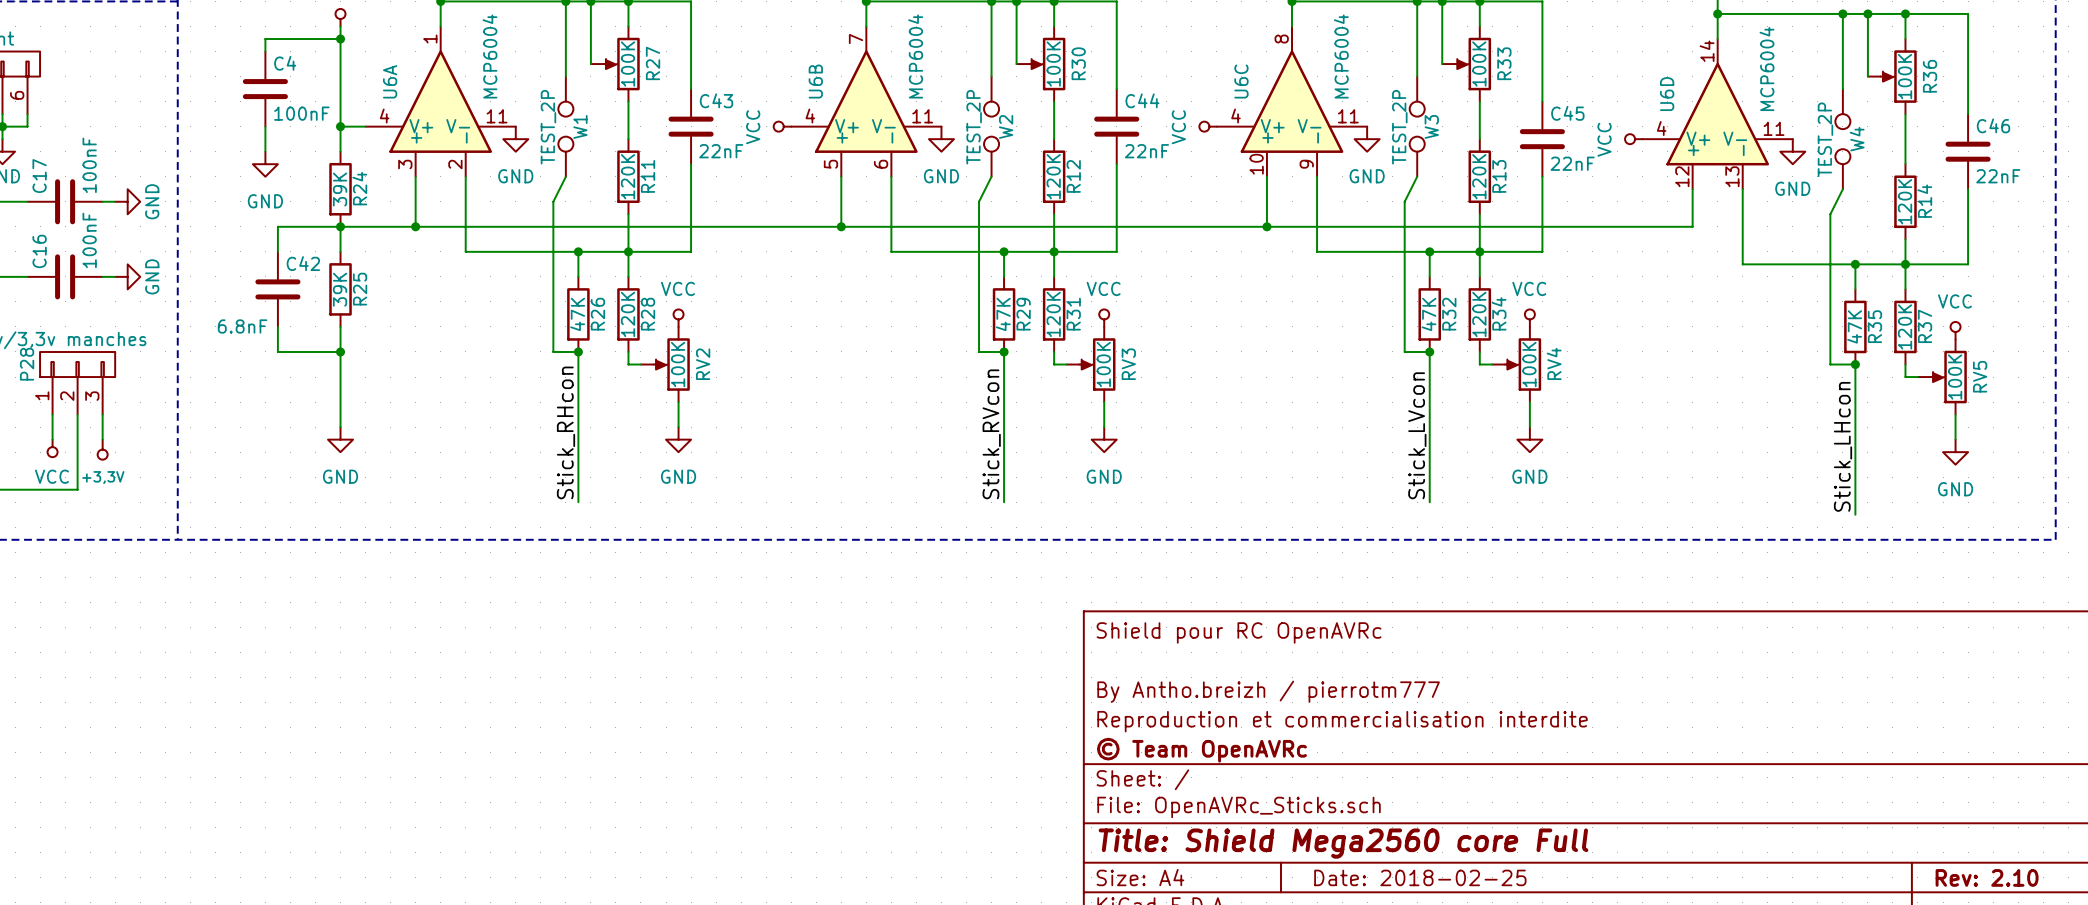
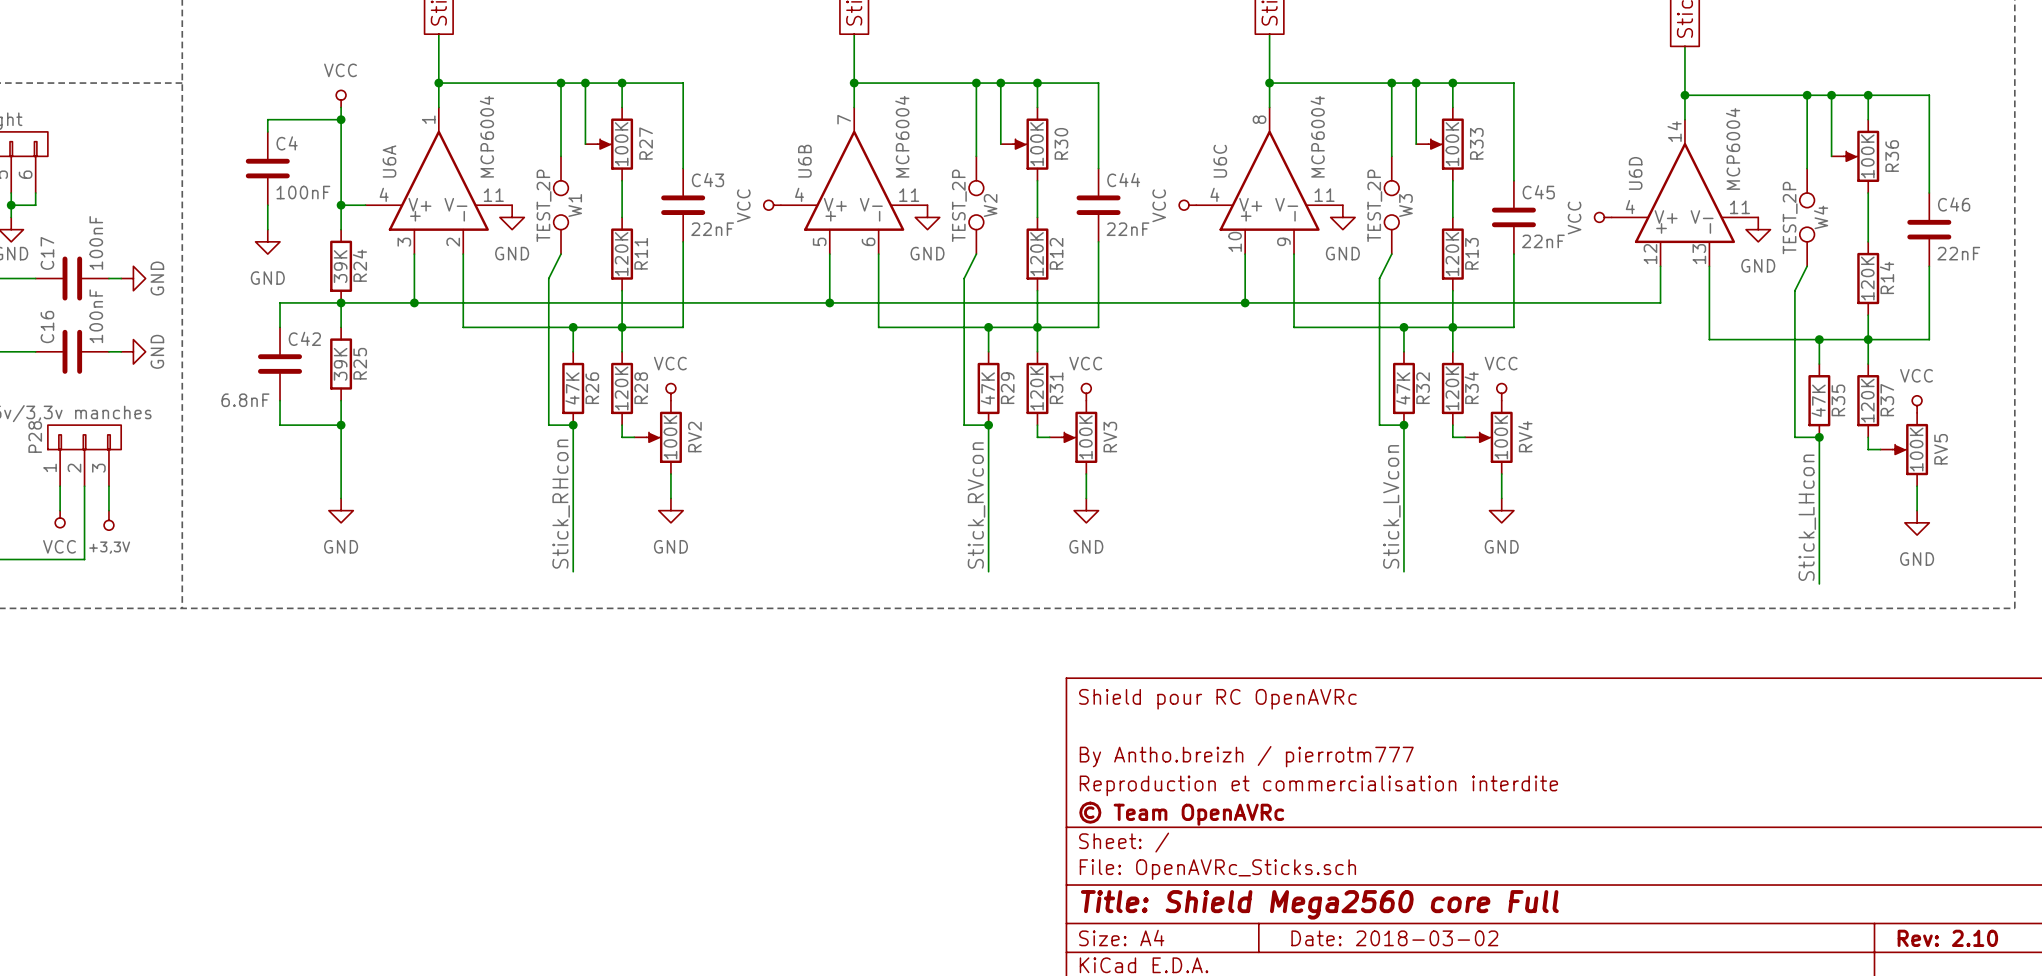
title block: Date: 2018-02-25 (1420, 877) -> Date: 2018-03-02 (1394, 938)

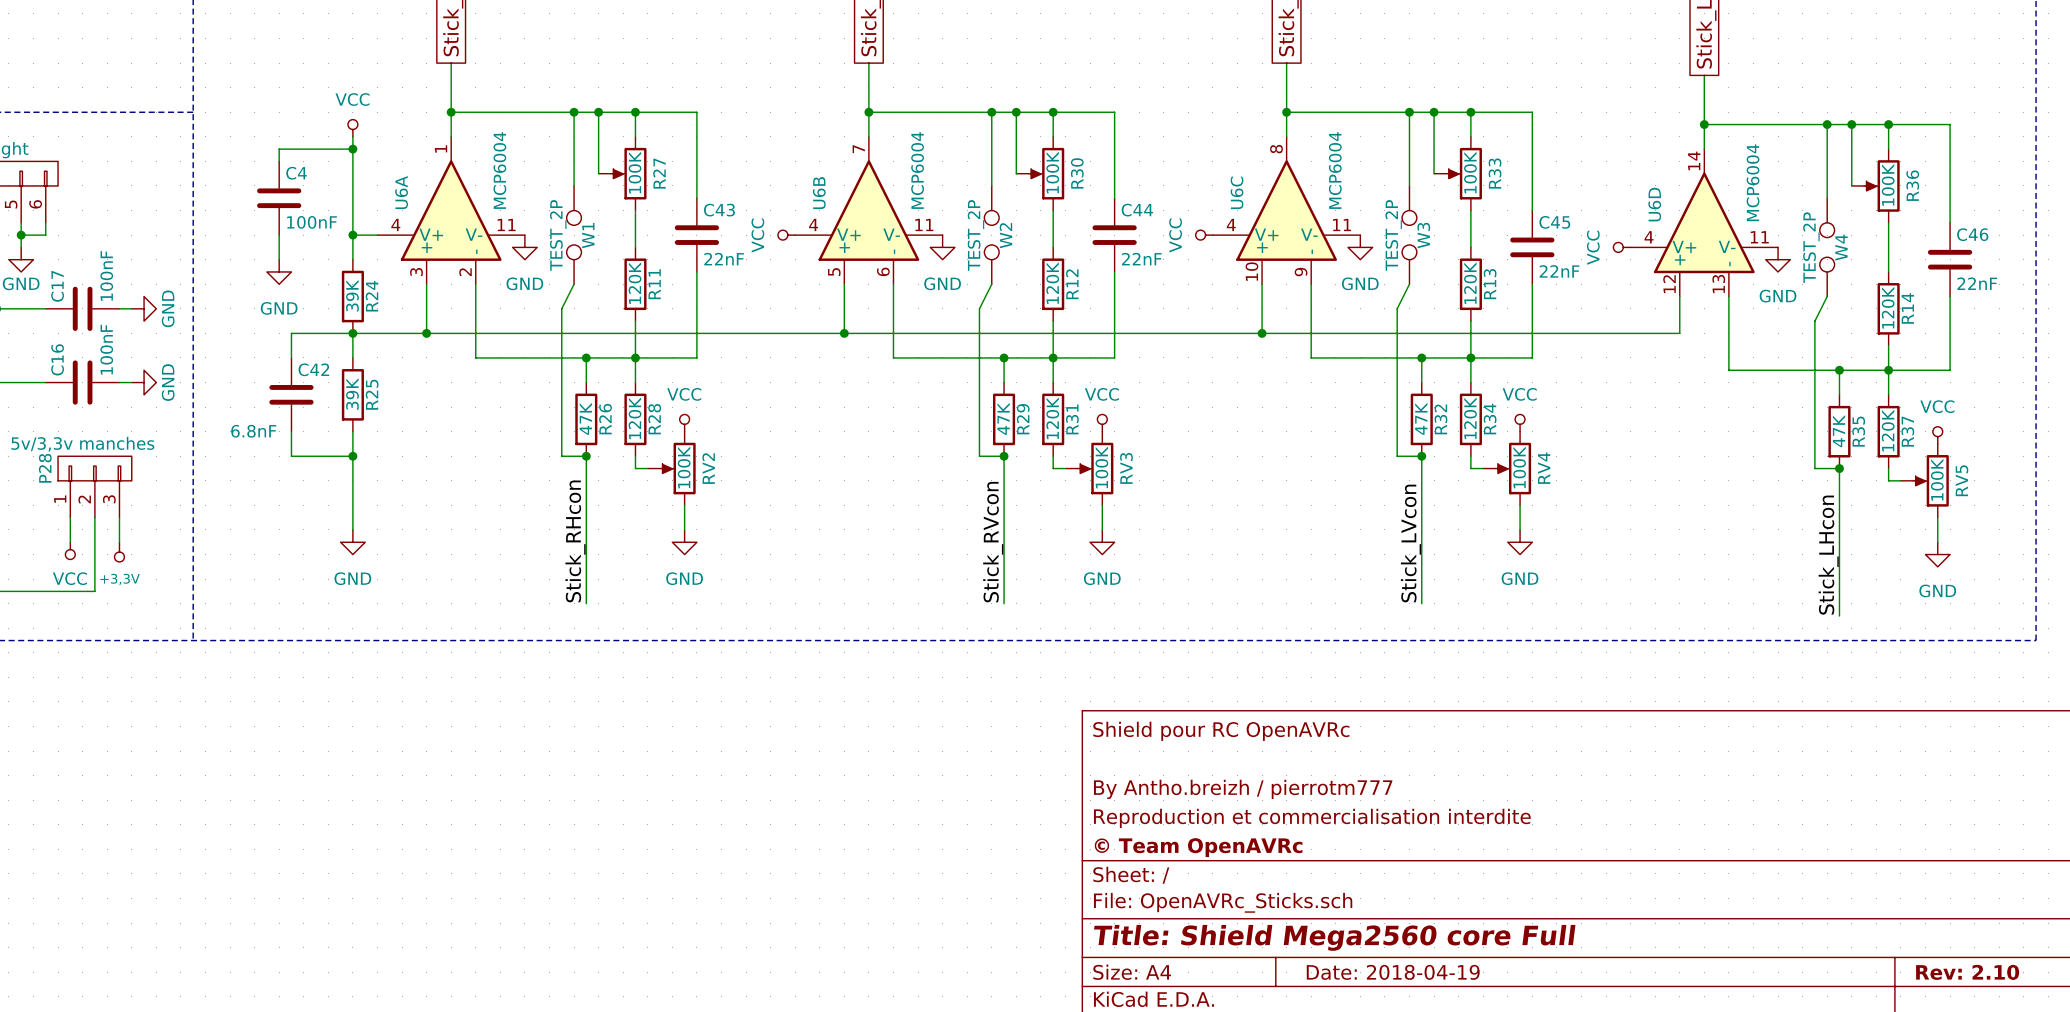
title block: Date: 2018-03-02 (1394, 938) -> Date: 2018-04-19 (1393, 972)

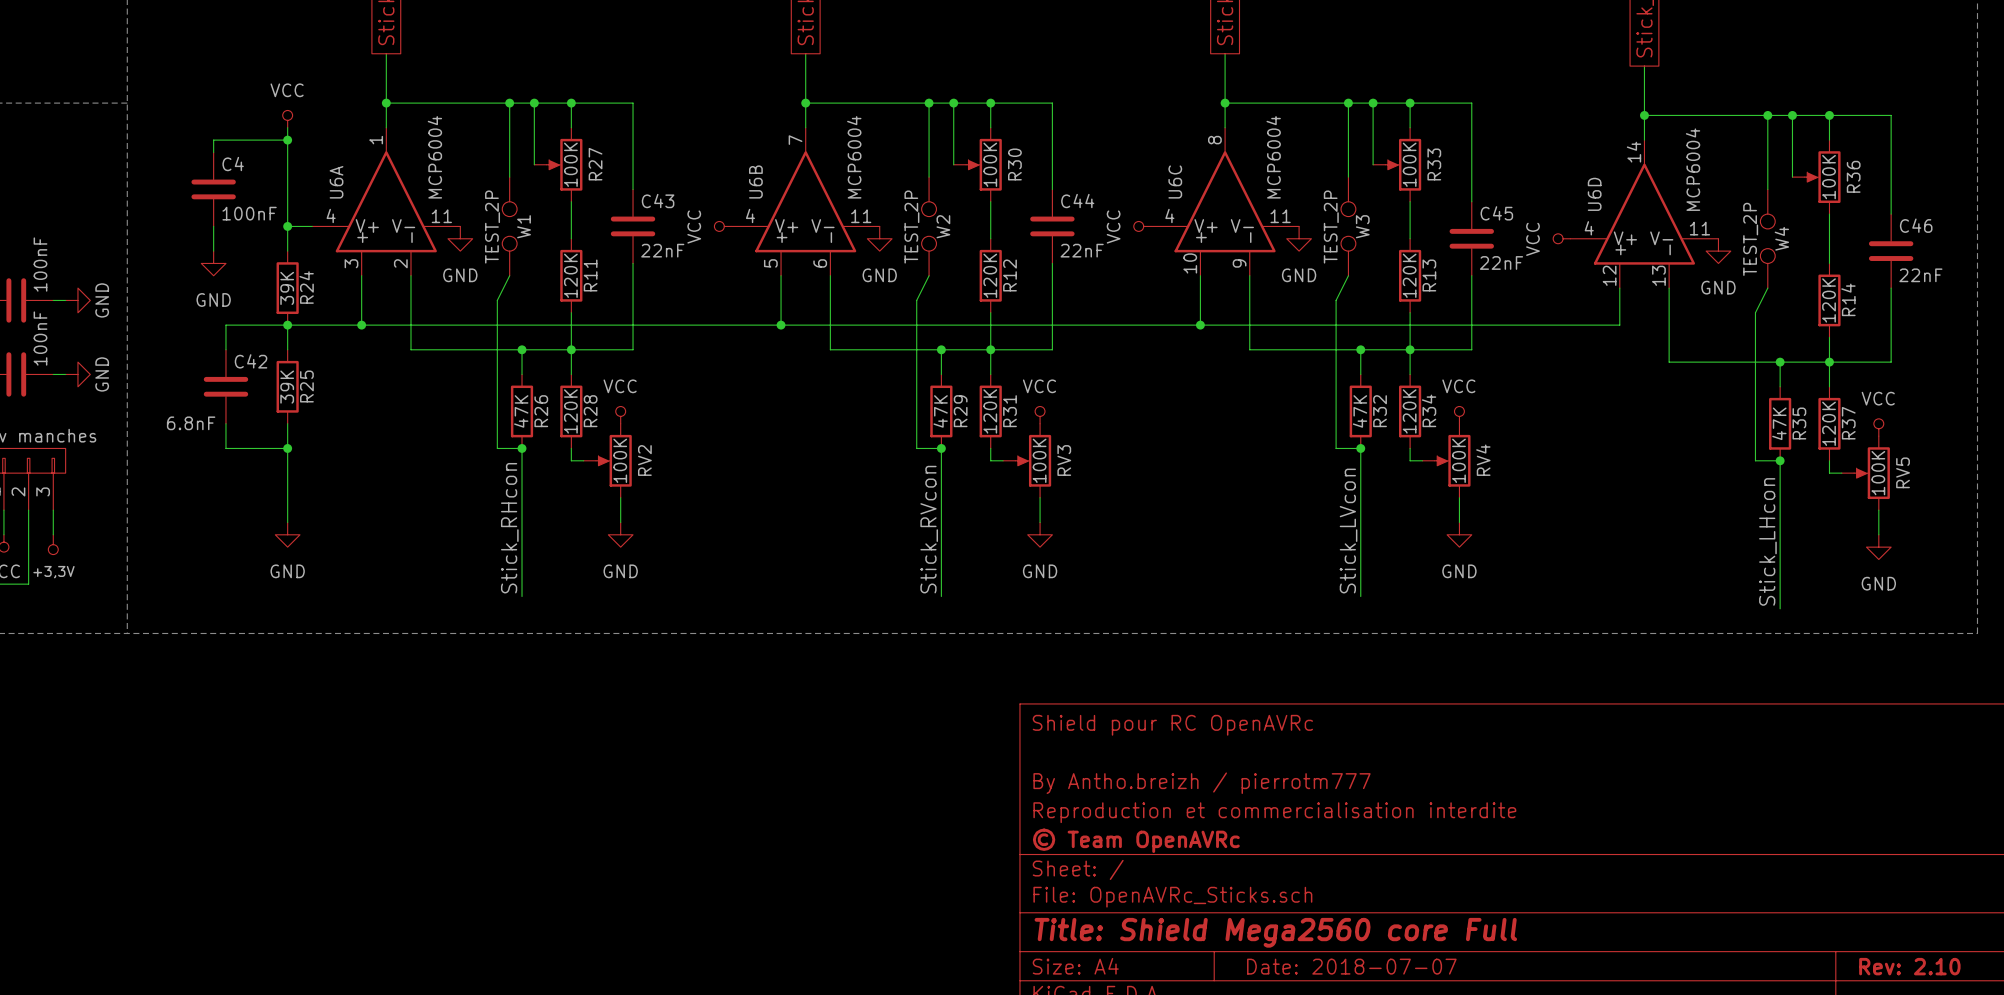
title block: Date: 2018-04-19 (1393, 972) -> Date: 2018-07-07 (1351, 966)

